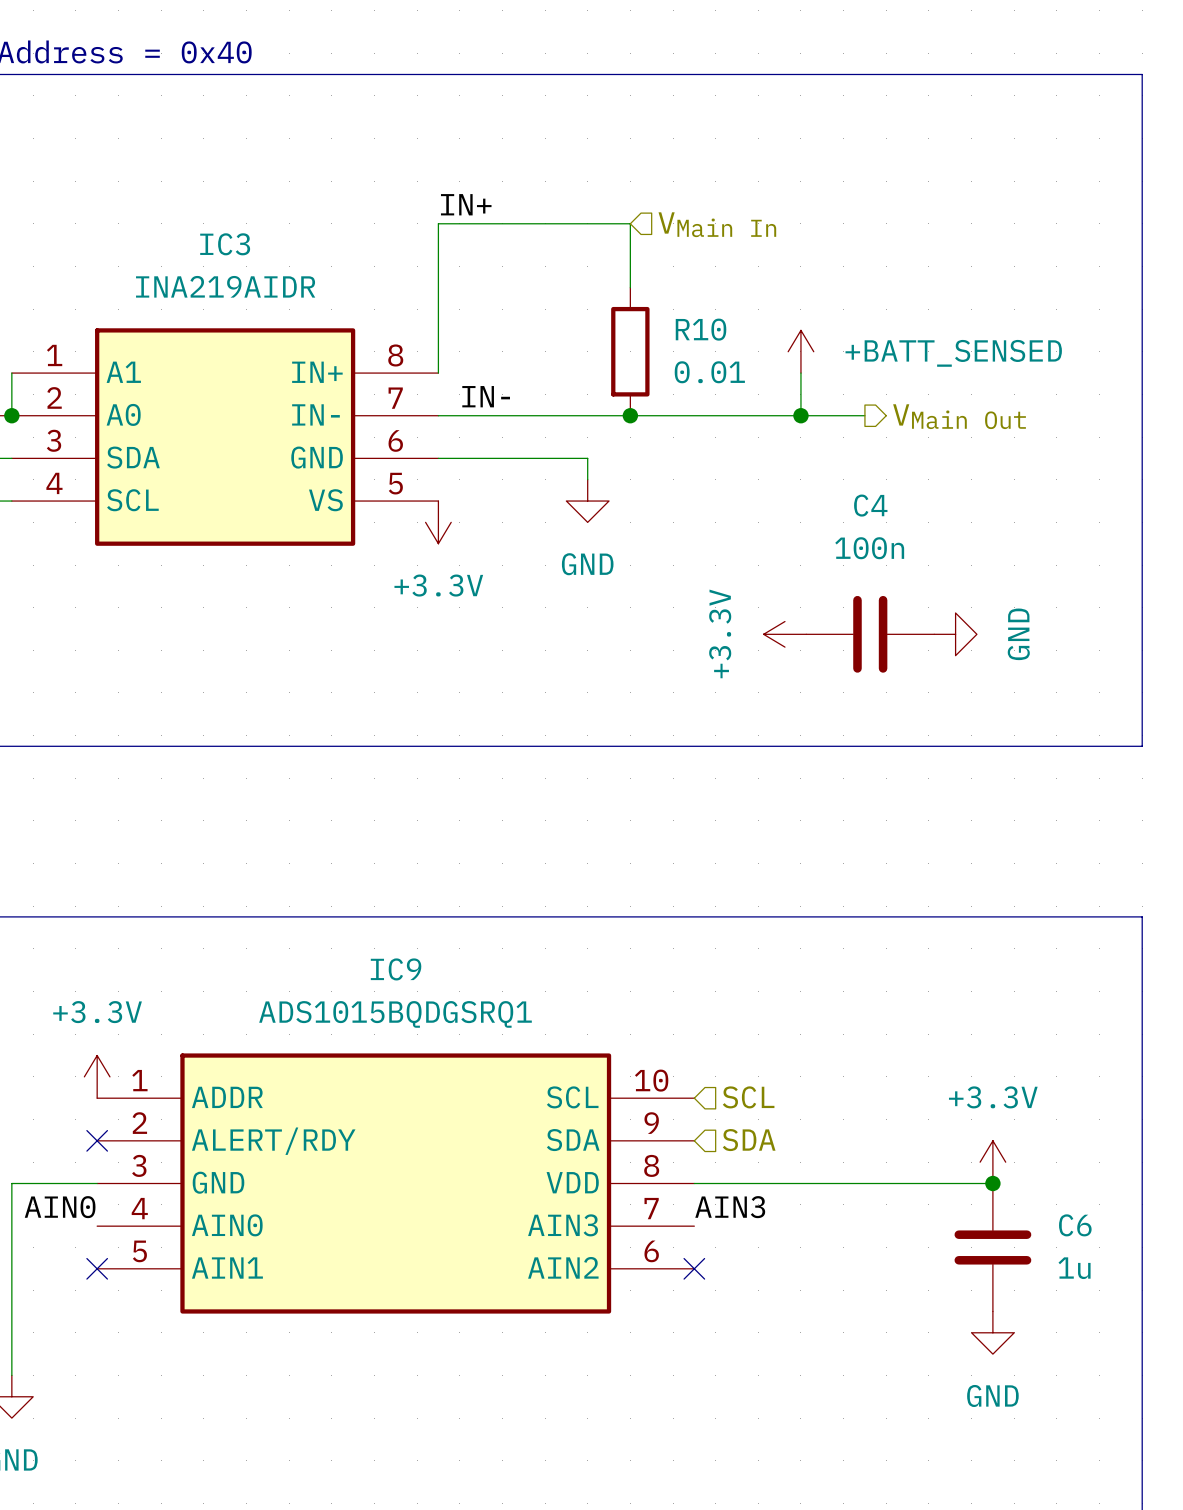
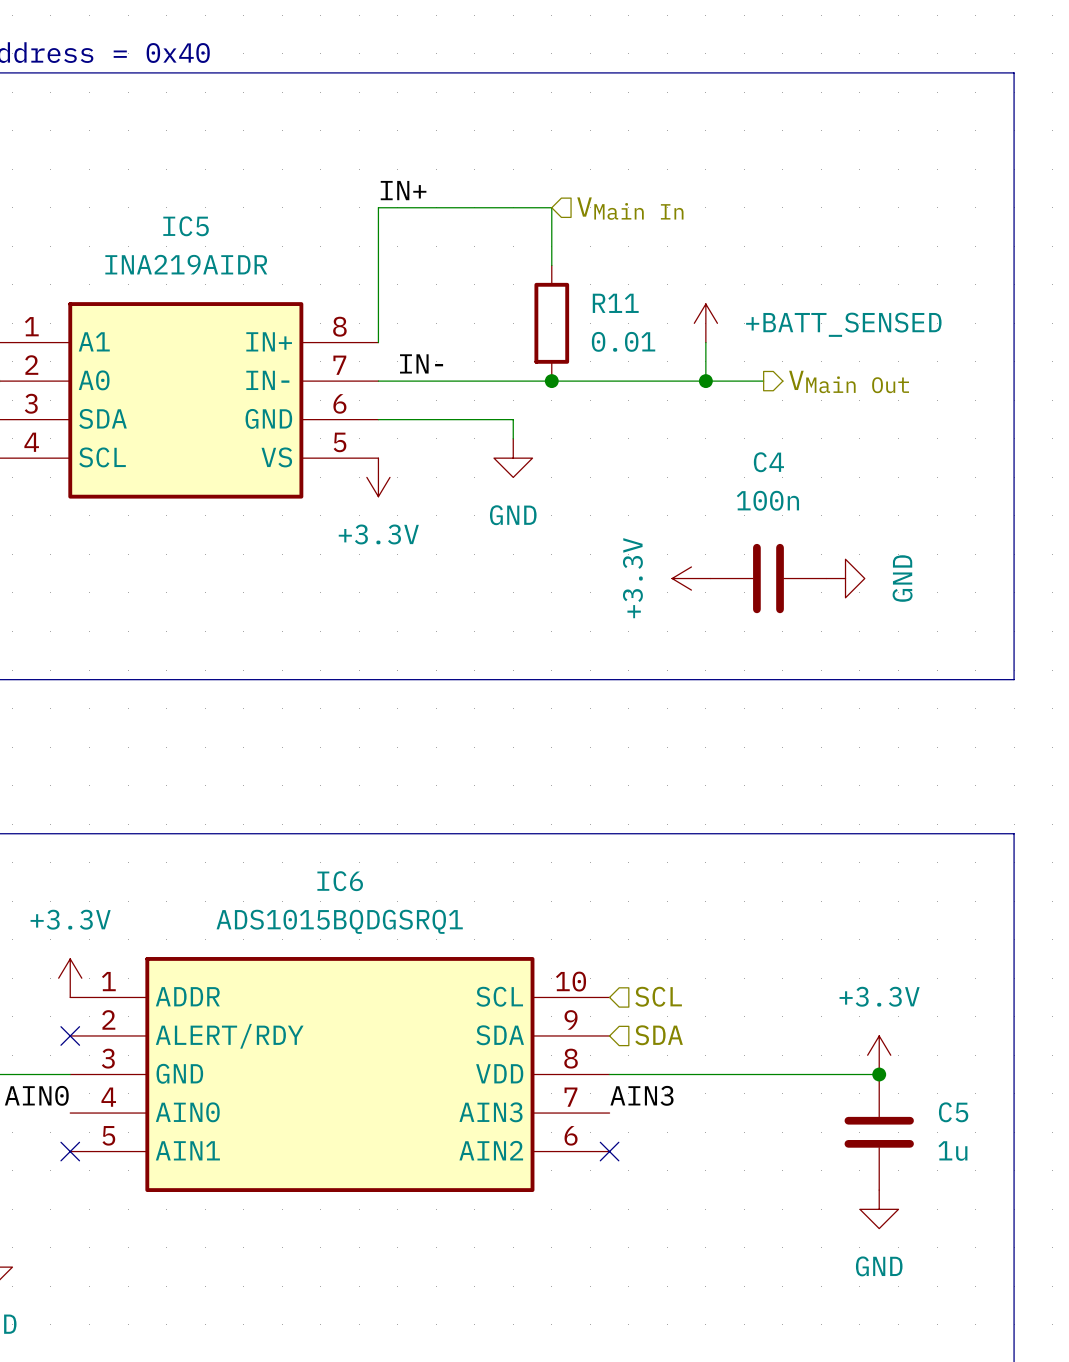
IC3 name: IC3 (225, 244) -> IC5 (186, 226)
R10 name: R10 (701, 329) -> R11 (615, 303)
IC9 name: IC9 (396, 969) -> IC6 (340, 881)
C6 name: C6 (1075, 1225) -> C5 (953, 1112)

